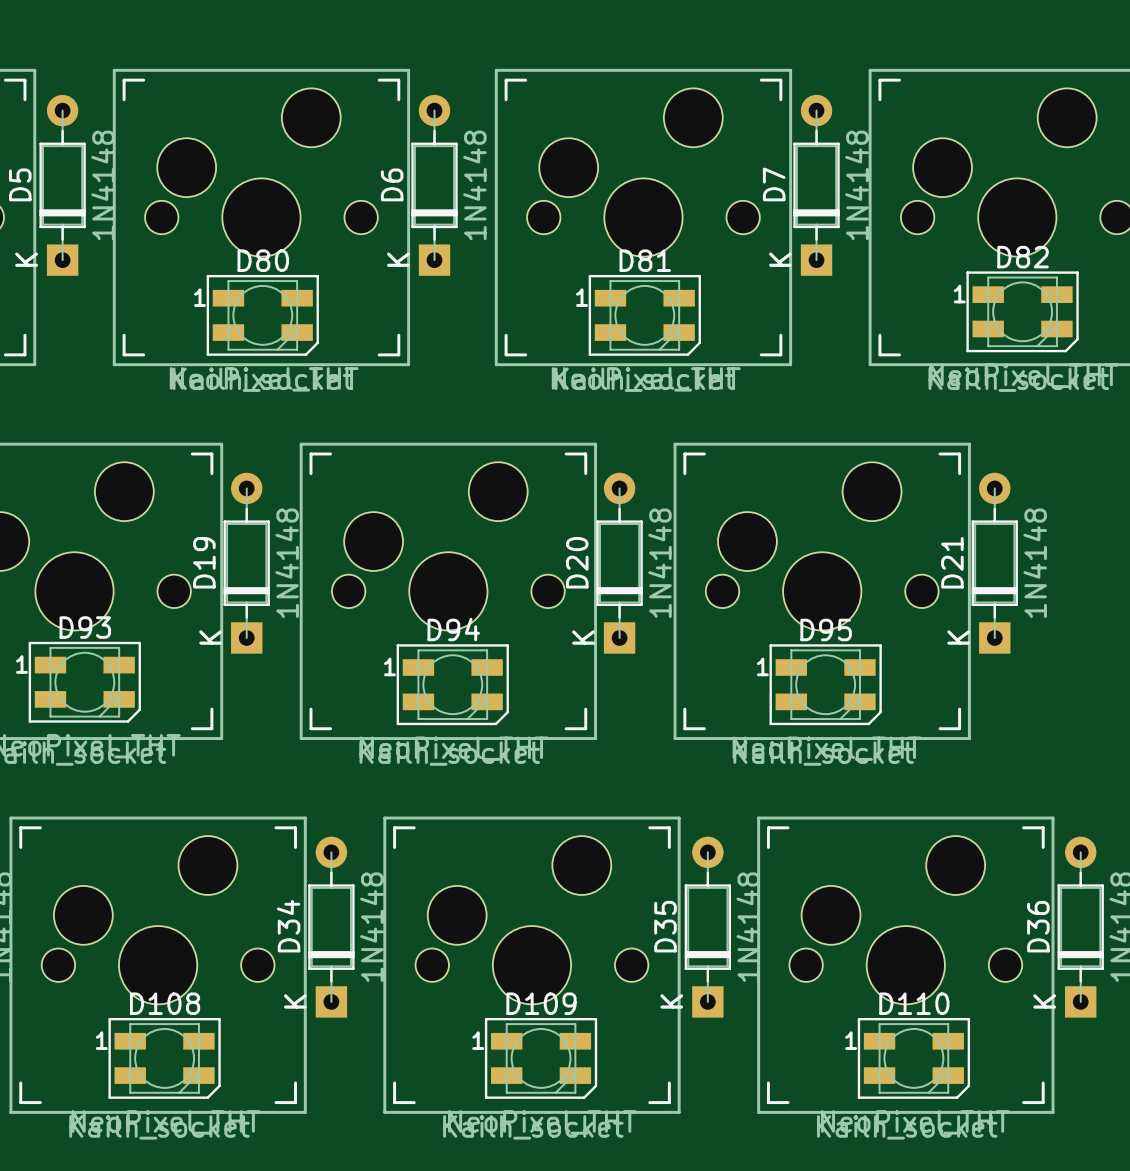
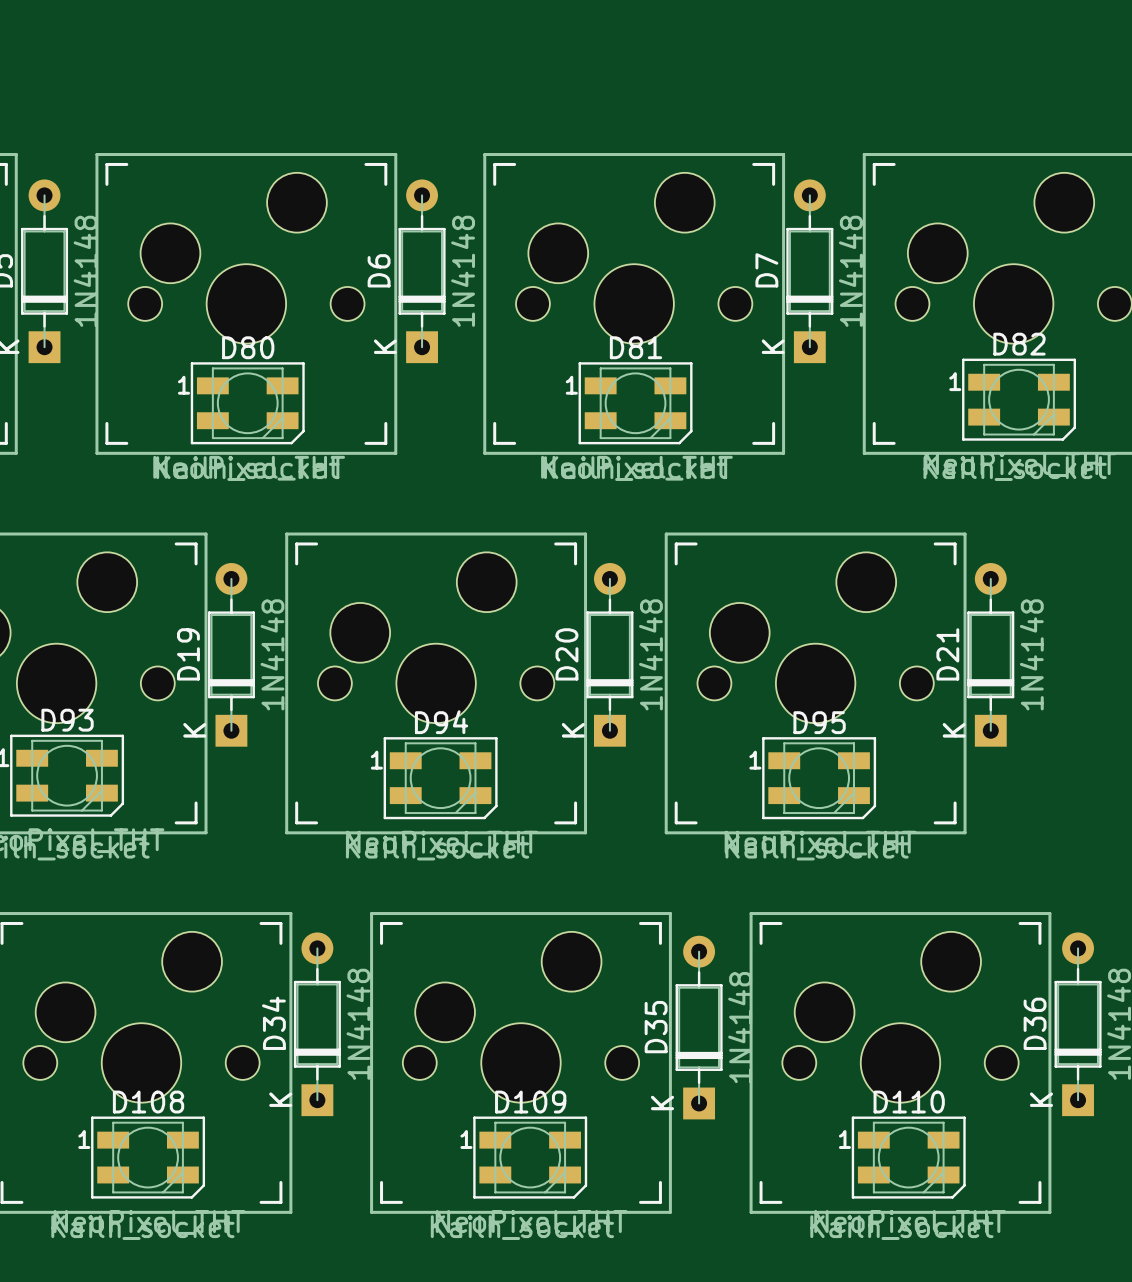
D35 footprint: [684, 836, 732, 1018] -> [675, 935, 723, 1120]

